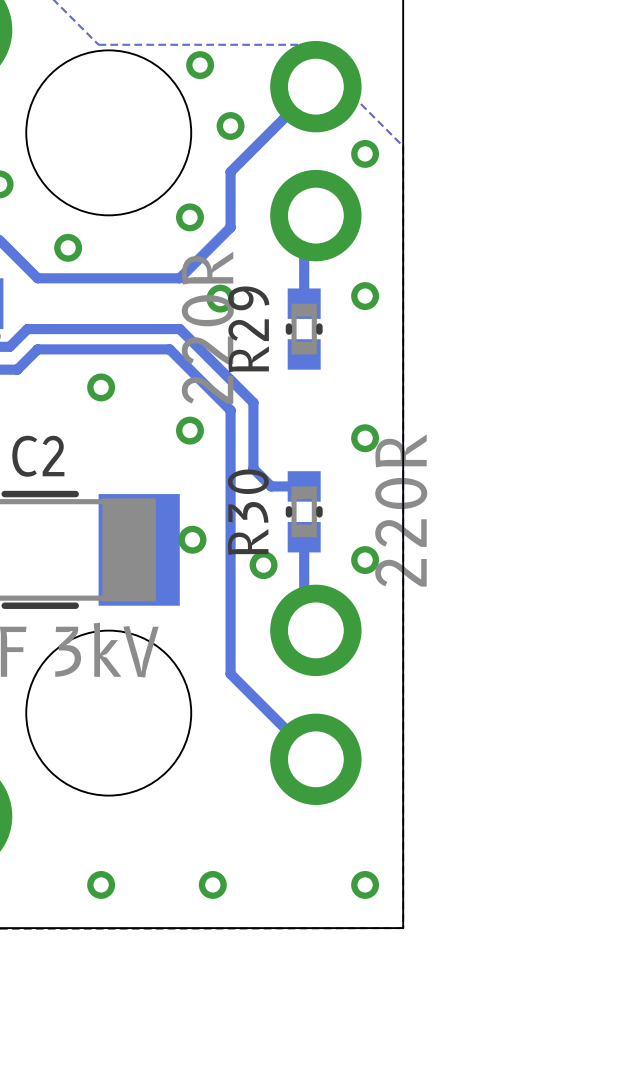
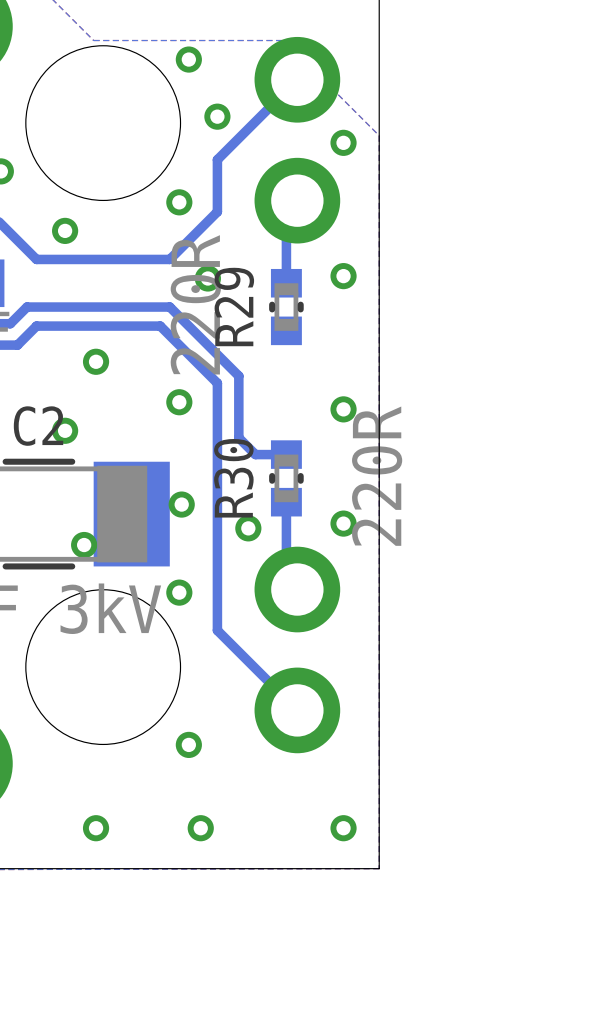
via: none -> (65, 430)
via: none -> (84, 545)
via: none -> (179, 592)
via: none -> (188, 744)

